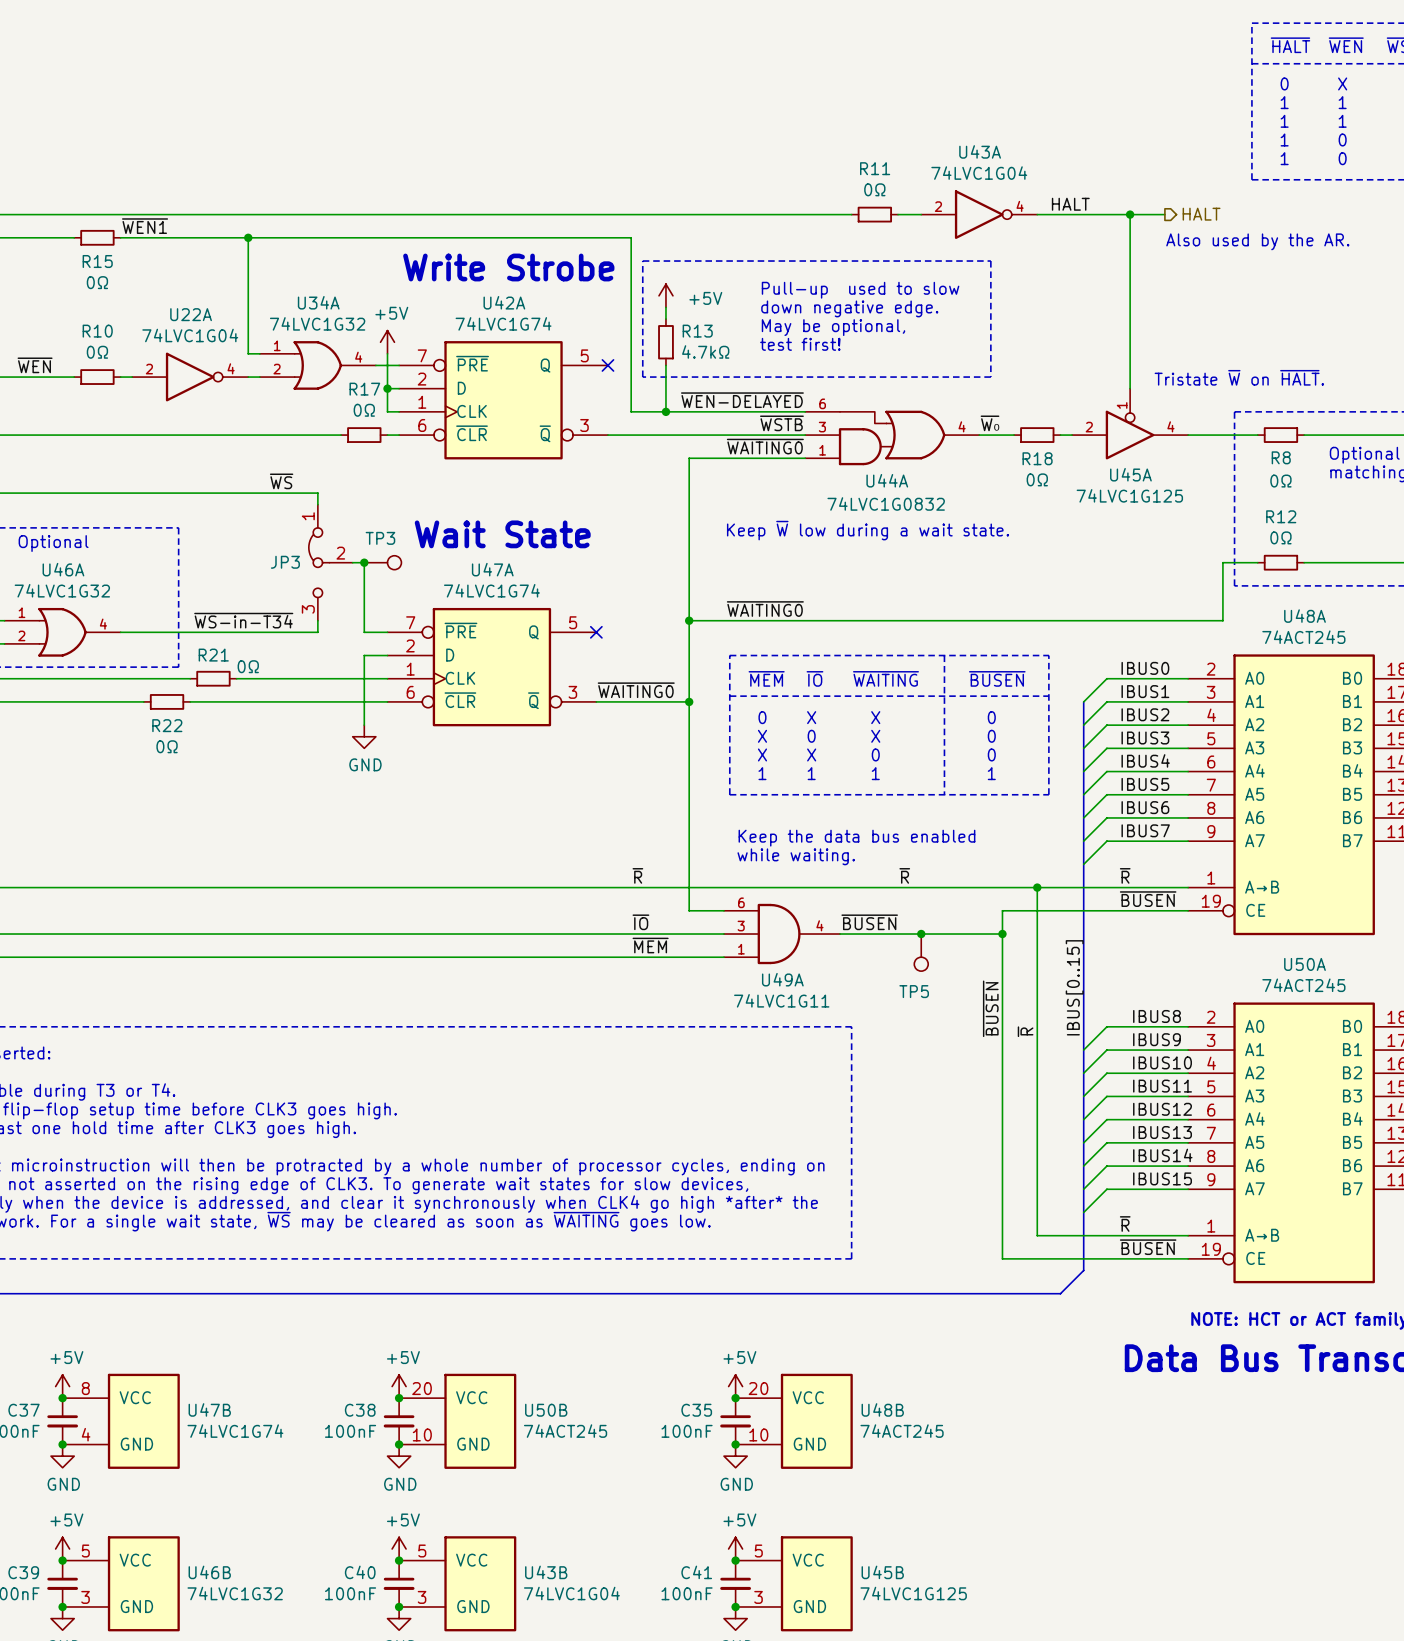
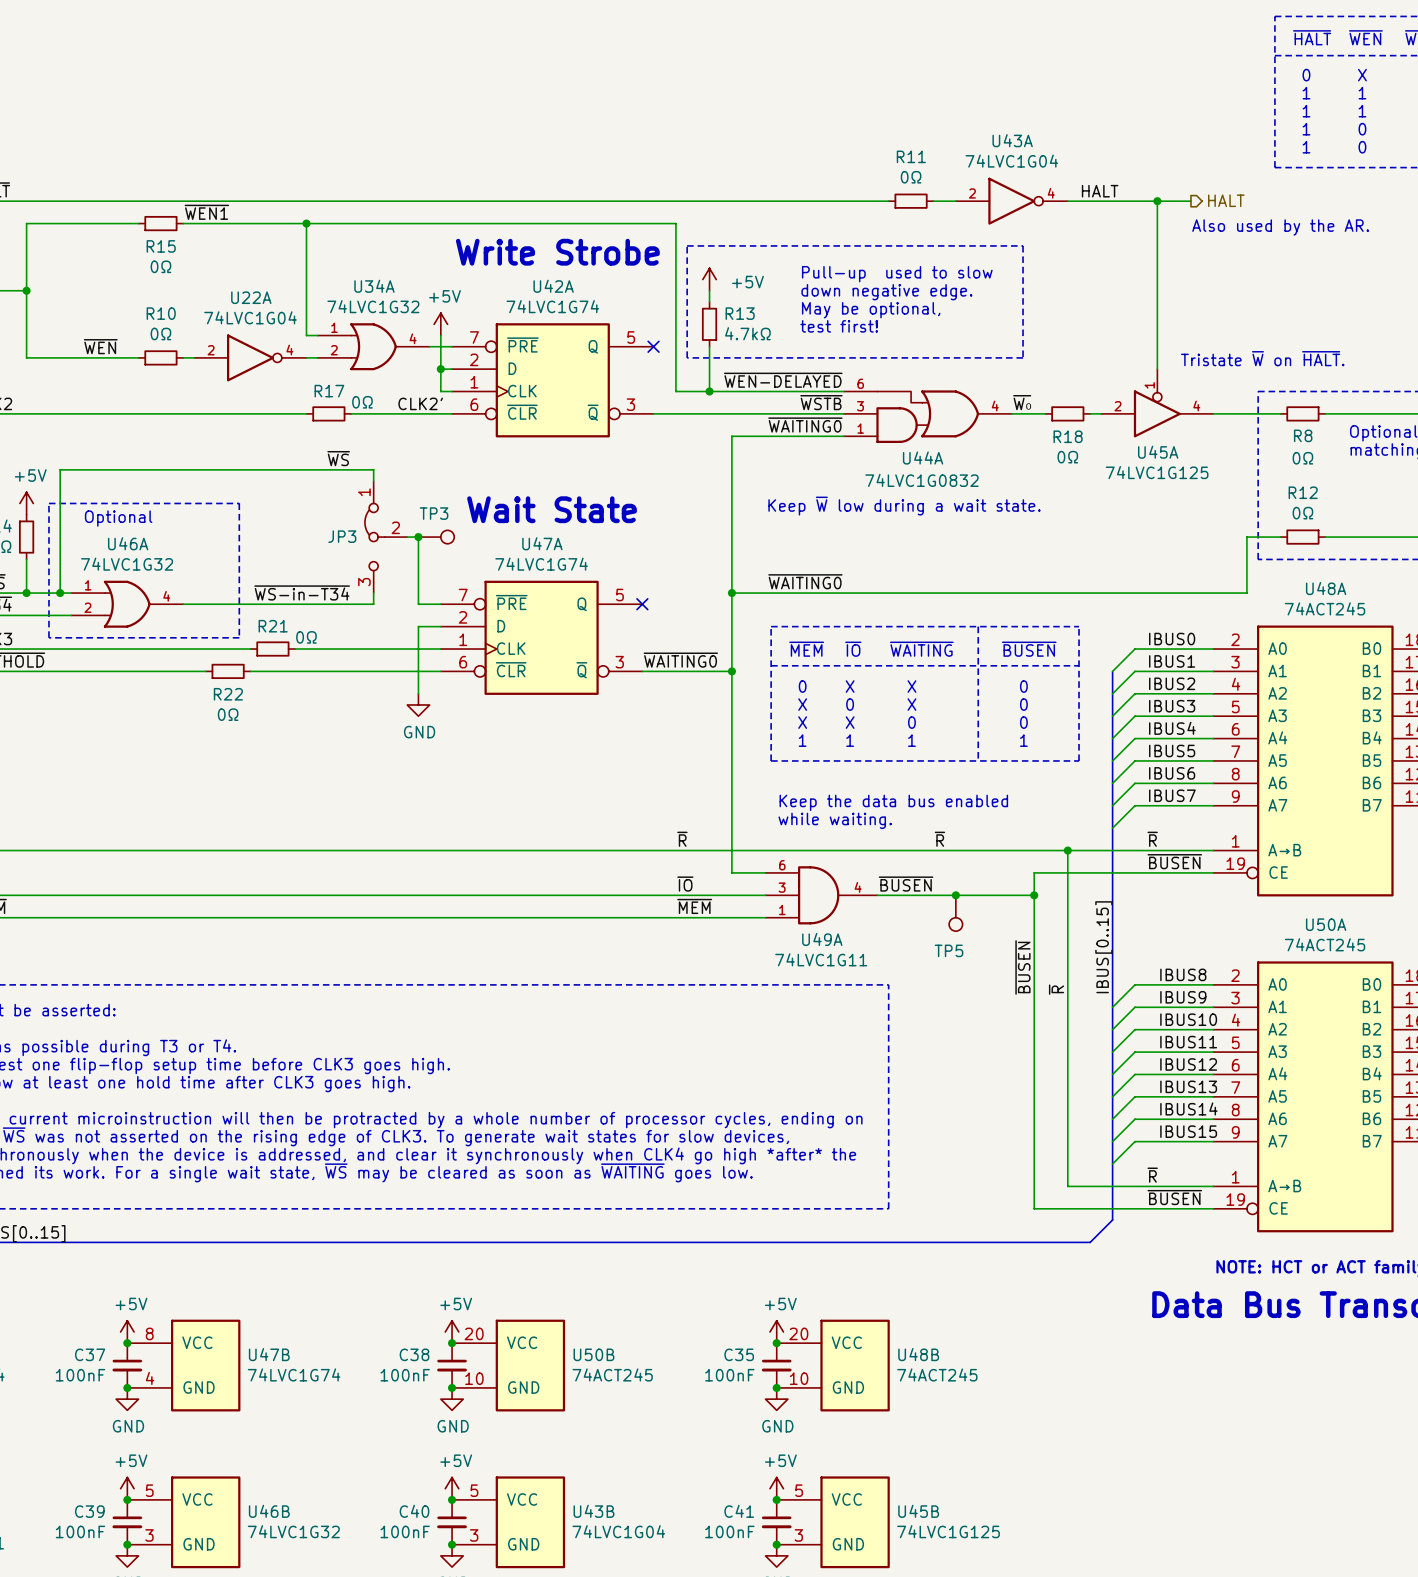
R17 name position: R17 (364, 389) -> R17 (329, 391)
R17 value position: 0Ω (364, 410) -> 0Ω (362, 402)
label: none -> CLK2' (420, 403)
wire: (248, 435) (294, 435) -> (396, 413) (440, 413)
R17 position: (364, 435) -> (328, 413)

